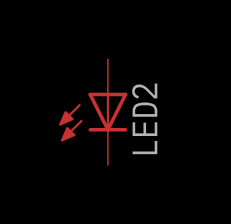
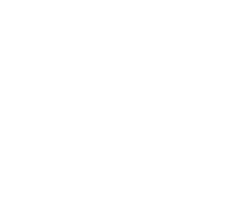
LED2: (93, 112) -> none

